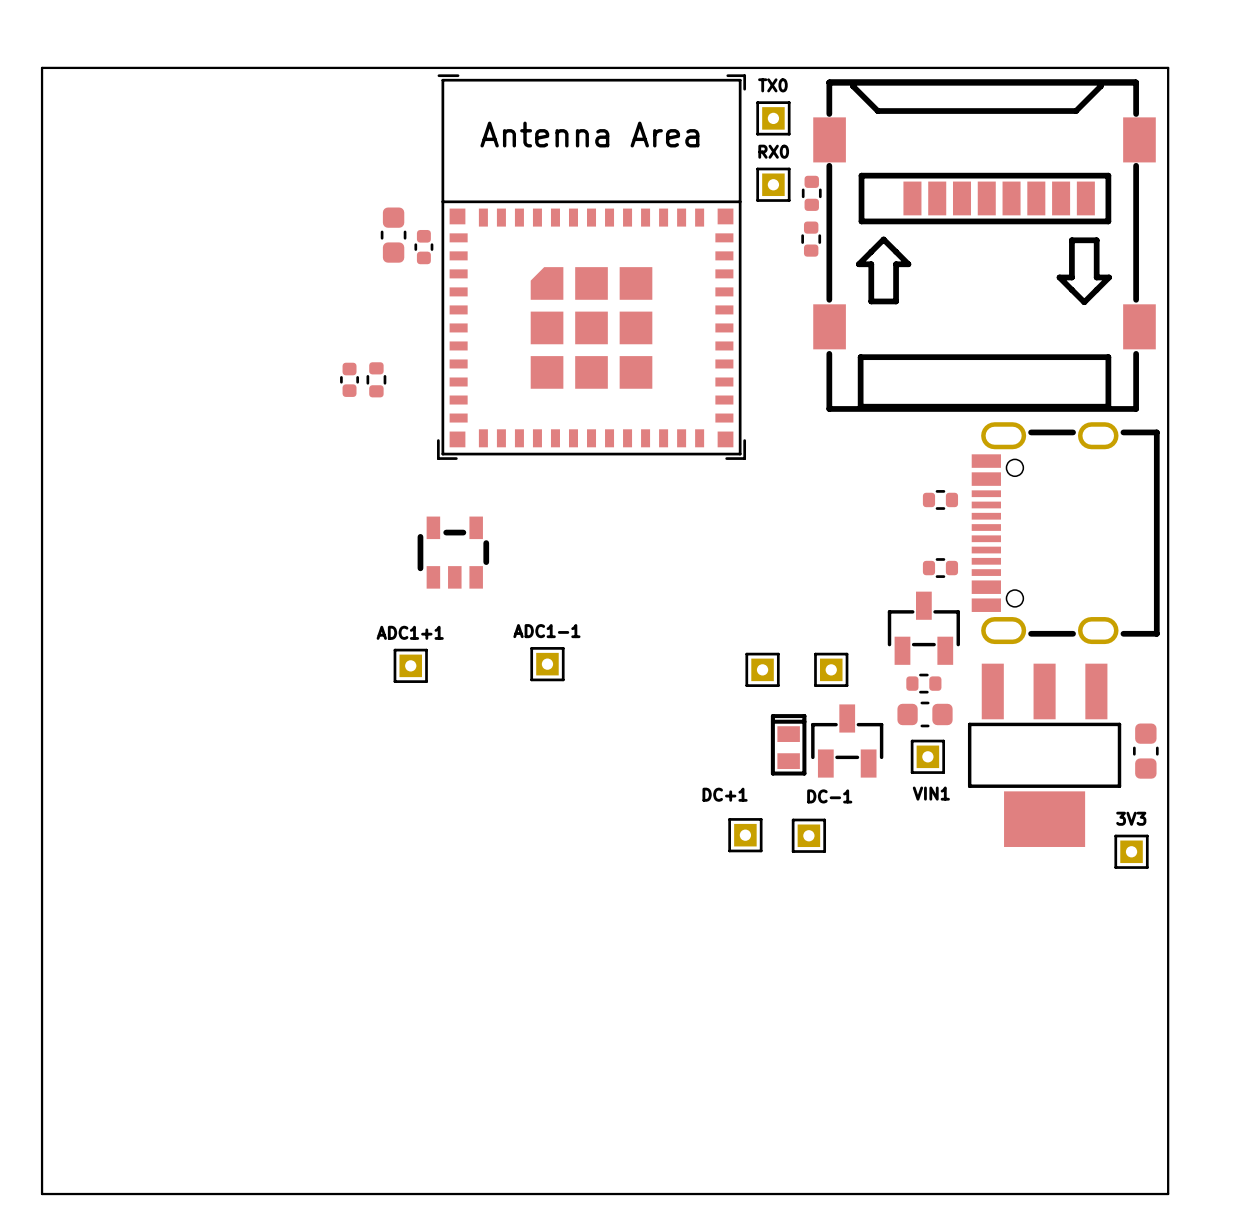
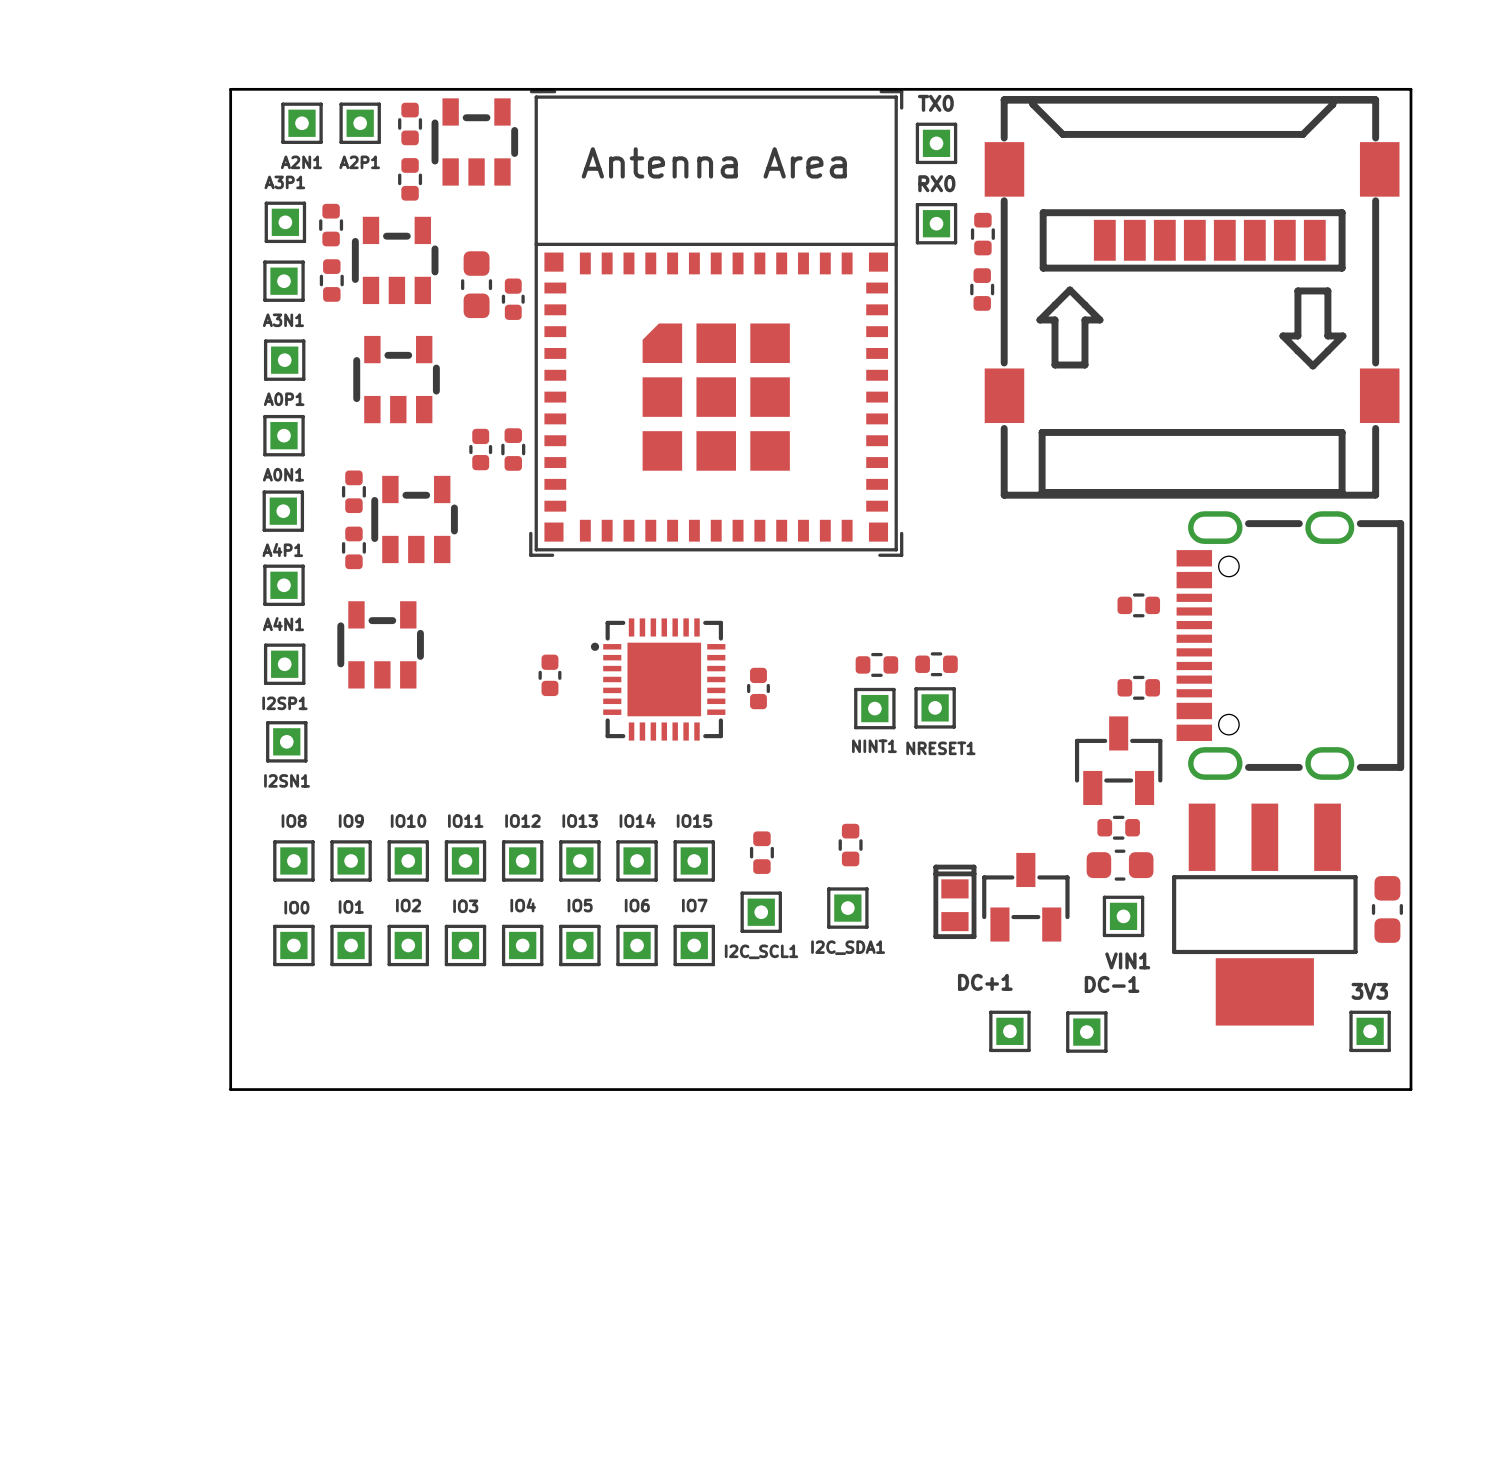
board edge: (42, 67) (1168, 67) (1168, 1194) (42, 1194) (42, 67) -> (230, 89) (230, 1089) (1410, 1089) (1410, 89) (230, 89)
A2N1: none -> (302, 123)
A2P1: none -> (360, 123)
part: none -> (410, 123)
part: none -> (474, 141)
part: none -> (410, 179)
A3P1: none -> (285, 222)
part: none -> (331, 225)
part: none -> (395, 260)
part: none -> (331, 280)
A3N1: none -> (284, 281)
A0P1: none -> (284, 360)
part: none -> (396, 379)
A0N1: none -> (284, 435)
part footprint: [366, 362, 387, 398] -> [469, 428, 493, 471]
part: none -> (513, 449)
part position: (349, 379) -> (758, 688)
part: none -> (353, 491)
A4P1: none -> (283, 511)
part: none -> (414, 519)
part: none -> (353, 547)
A4N1: none -> (284, 585)
part footprint: [417, 516, 490, 589] -> [538, 654, 562, 697]
part: none -> (380, 644)
I2SP1: none -> (284, 664)
part: none -> (936, 664)
part: none -> (876, 664)
part: none -> (658, 679)
NRESET1: none -> (935, 707)
NINT1: none -> (874, 708)
I2SN1: none -> (286, 741)
ADC1-1: (547, 664) -> none
ADC1+1: (410, 665) -> none
part: (762, 669) -> none
part: (831, 669) -> none
part: none -> (850, 845)
part: none -> (761, 852)
IO8: none -> (293, 860)
IO9: none -> (351, 860)
IO10: none -> (408, 860)
IO11: none -> (465, 860)
IO12: none -> (522, 860)
IO13: none -> (579, 860)
IO14: none -> (637, 860)
IO15: none -> (694, 860)
I2C_SDA1: none -> (847, 908)
I2C_SCL1: none -> (761, 912)
IO0: none -> (293, 945)
IO1: none -> (351, 945)
IO2: none -> (408, 945)
IO3: none -> (465, 945)
IO4: none -> (522, 945)
IO5: none -> (579, 945)
IO6: none -> (637, 945)
IO7: none -> (694, 945)
DC+1 position: (745, 835) -> (1009, 1031)
DC-1 position: (808, 835) -> (1086, 1032)

